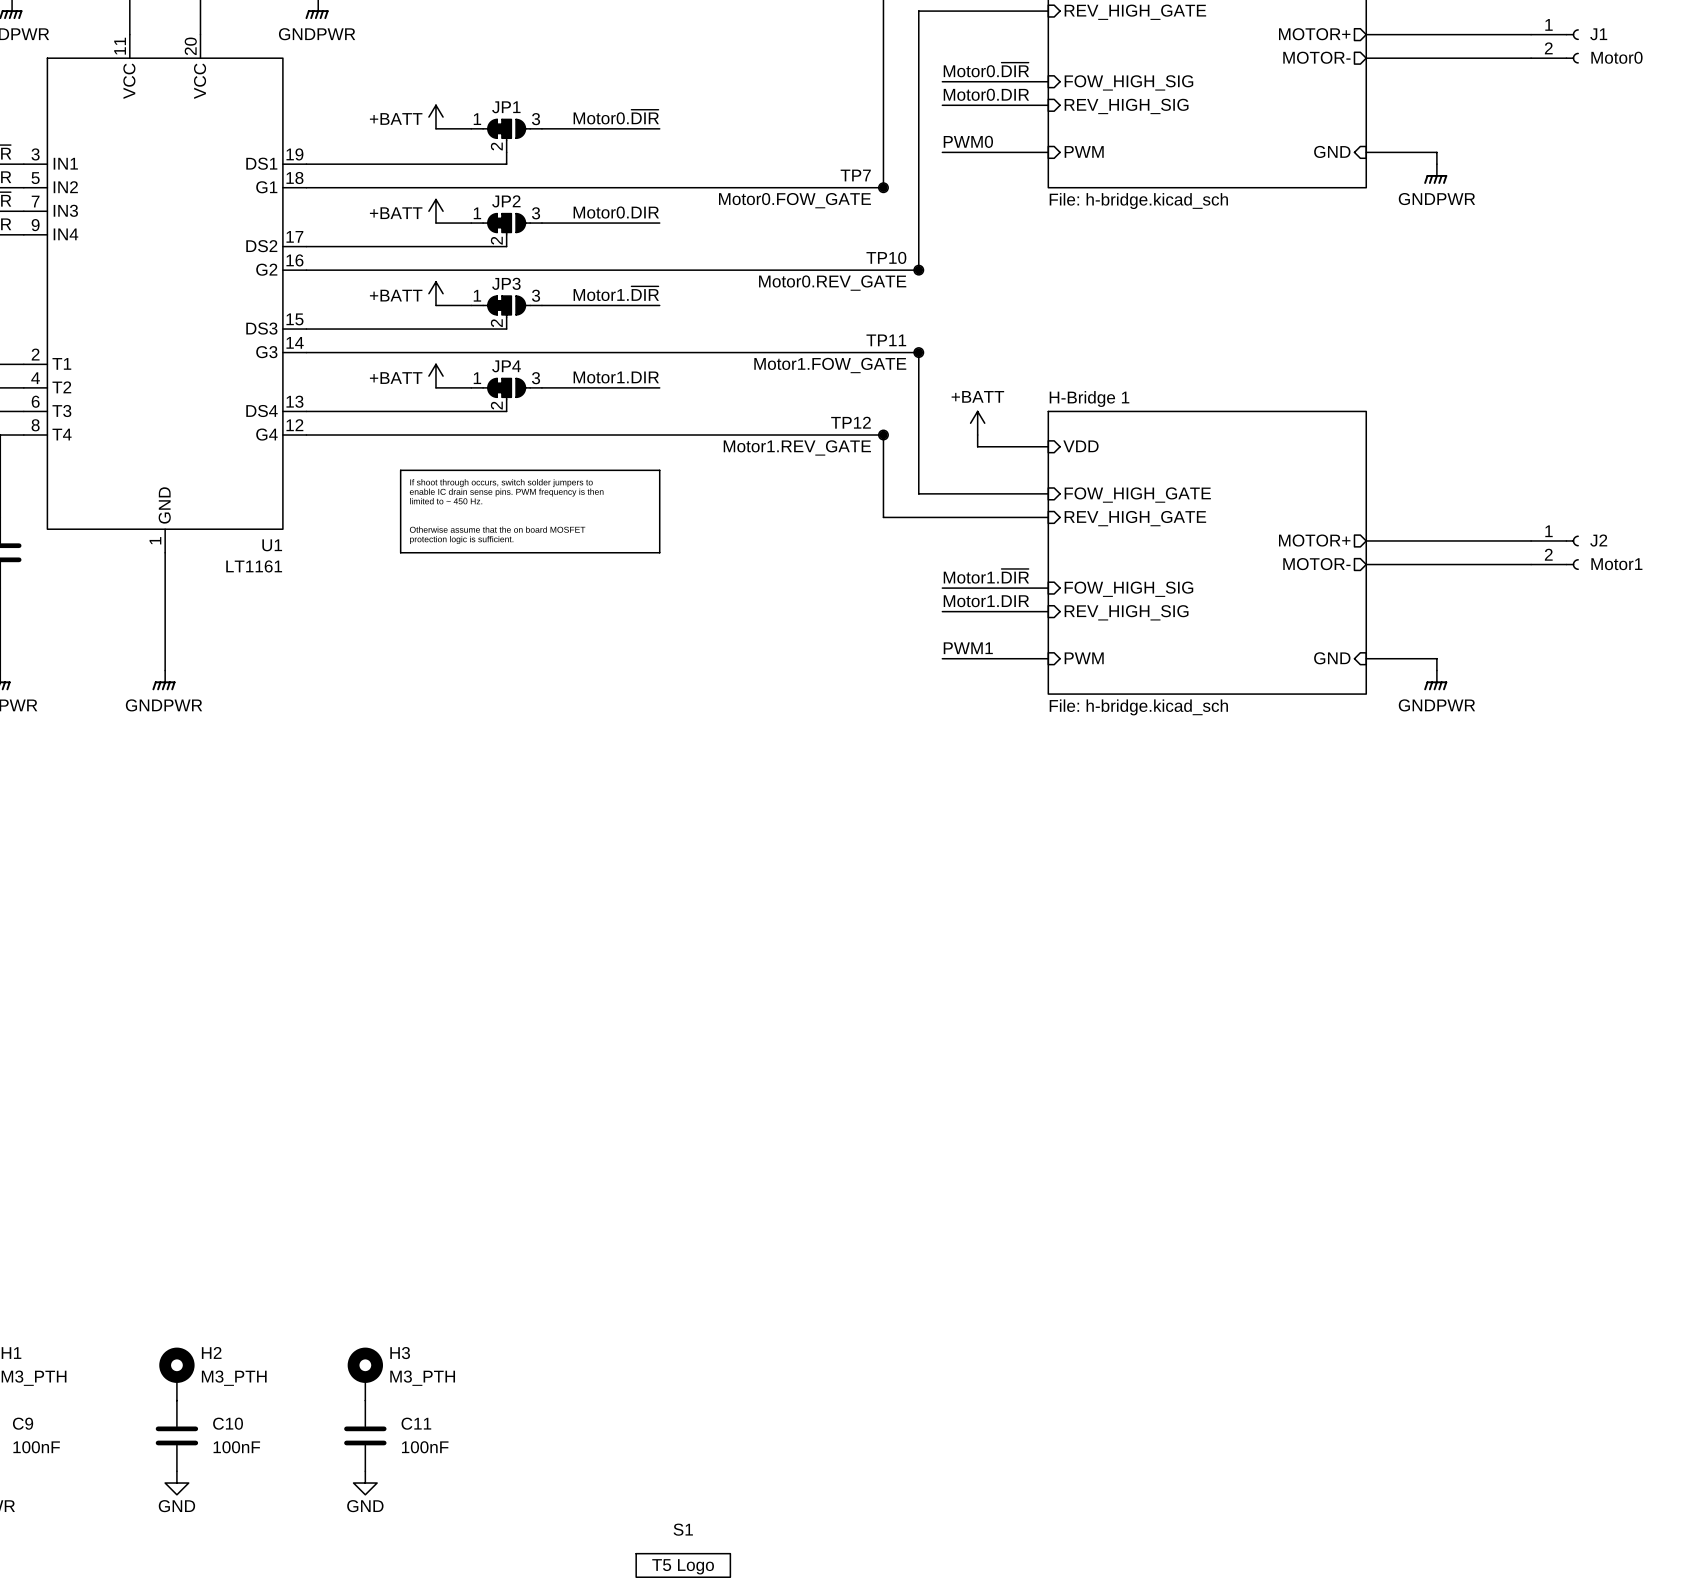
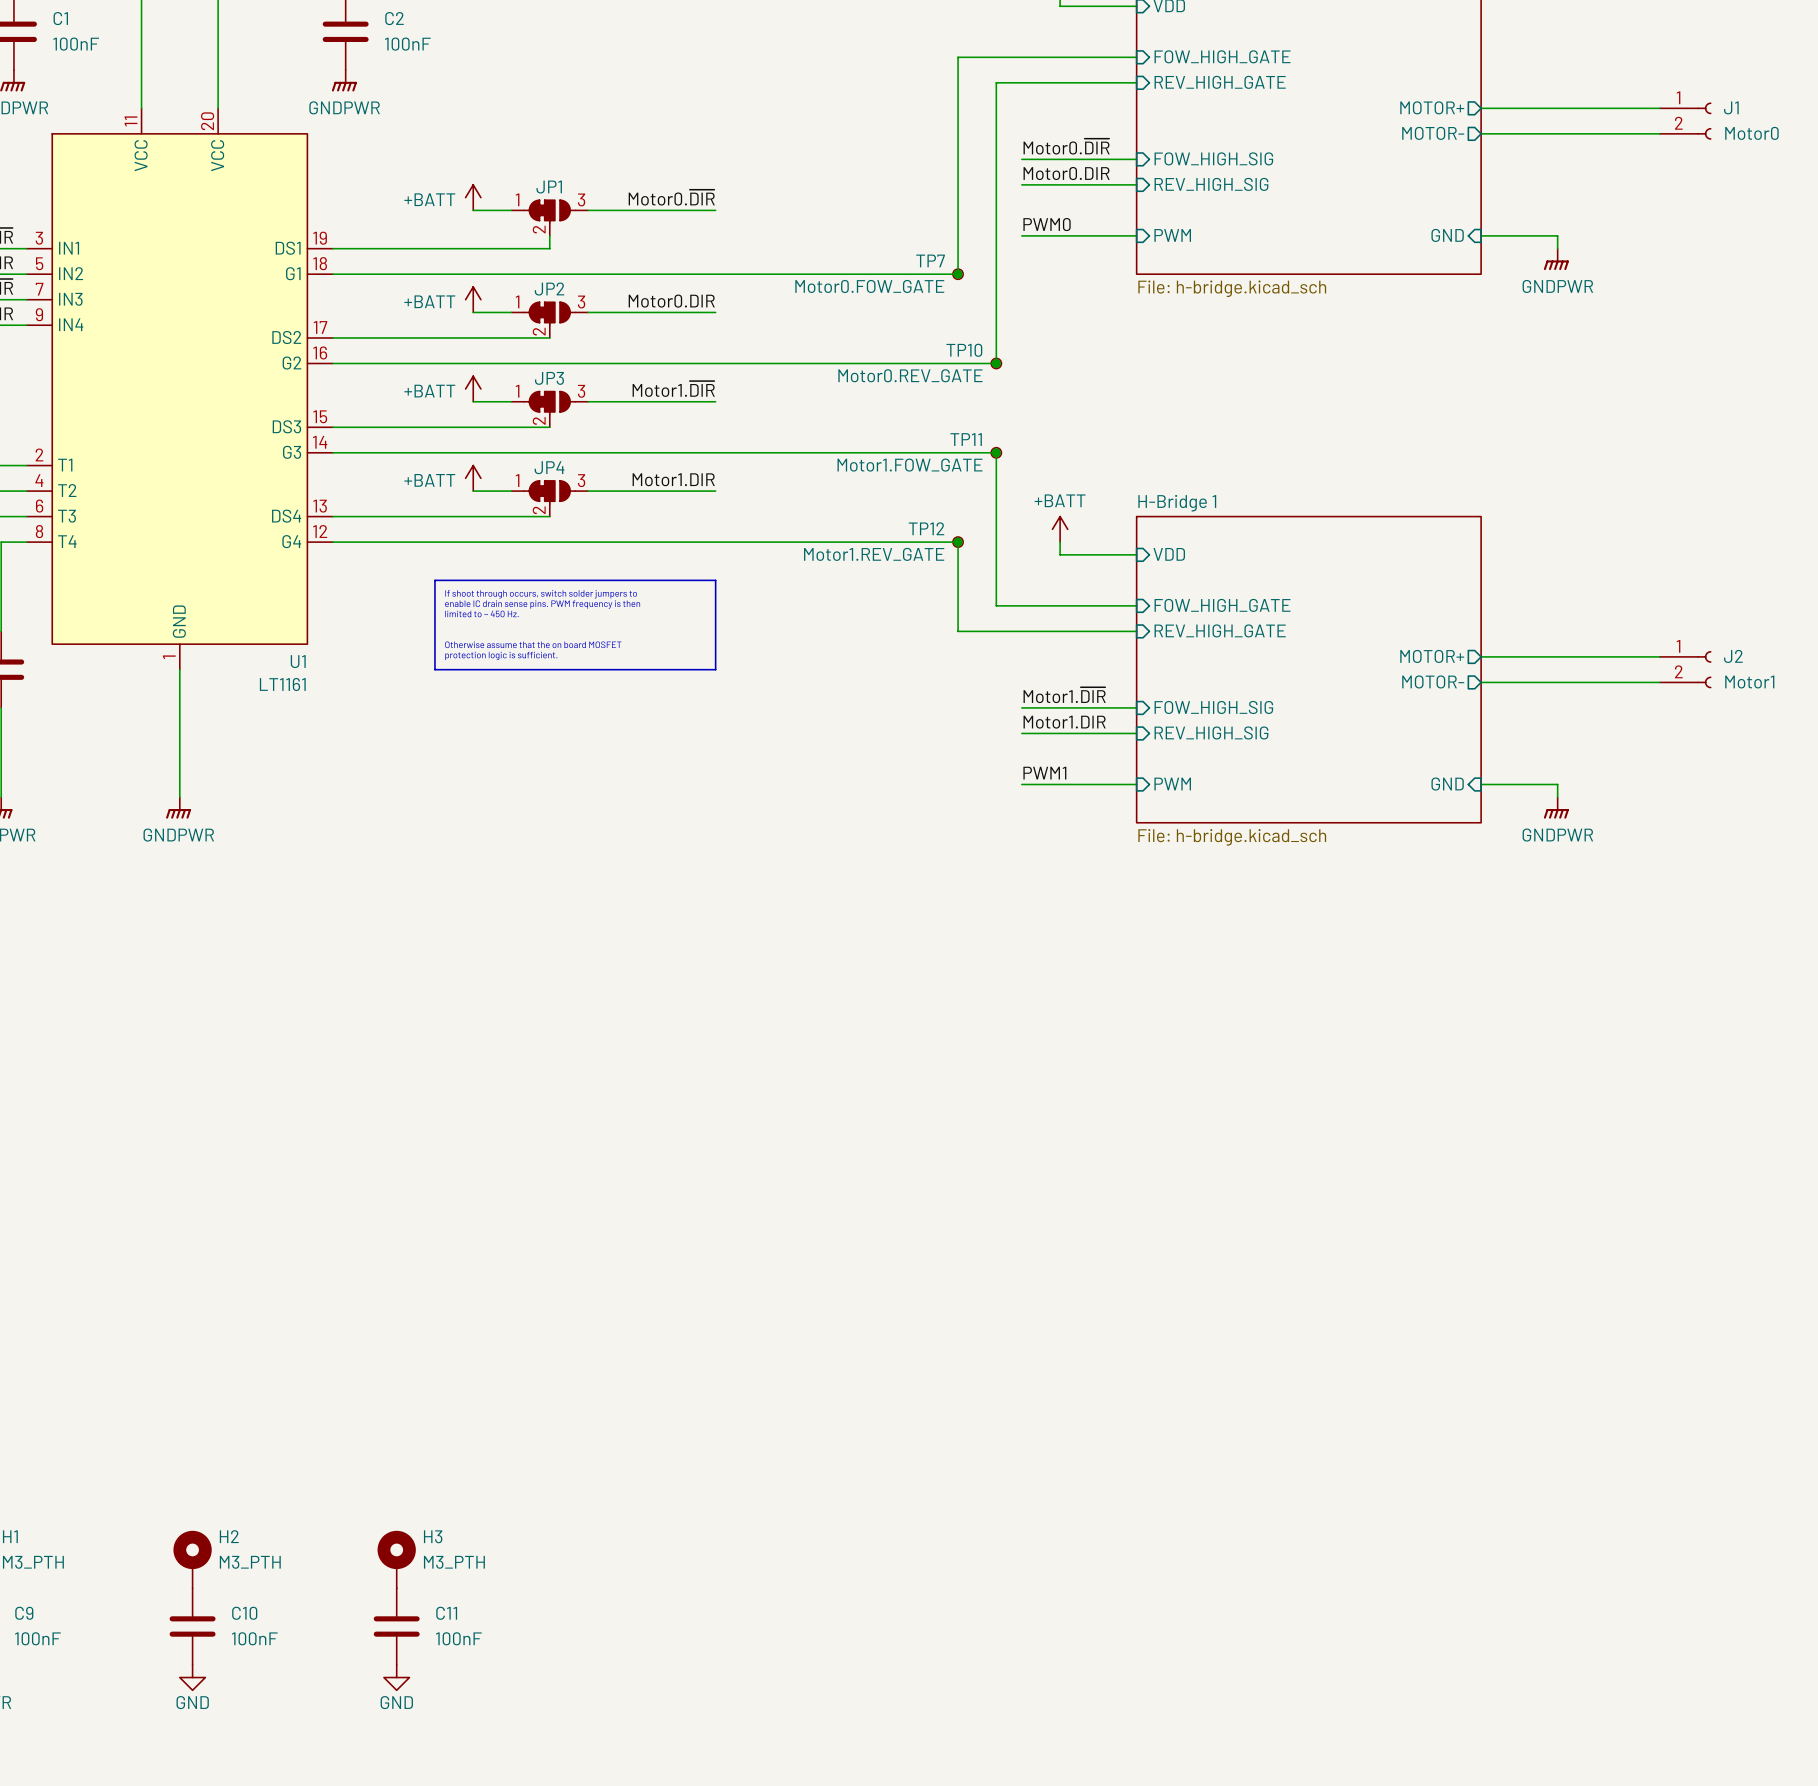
S1: (683, 1565) -> none

